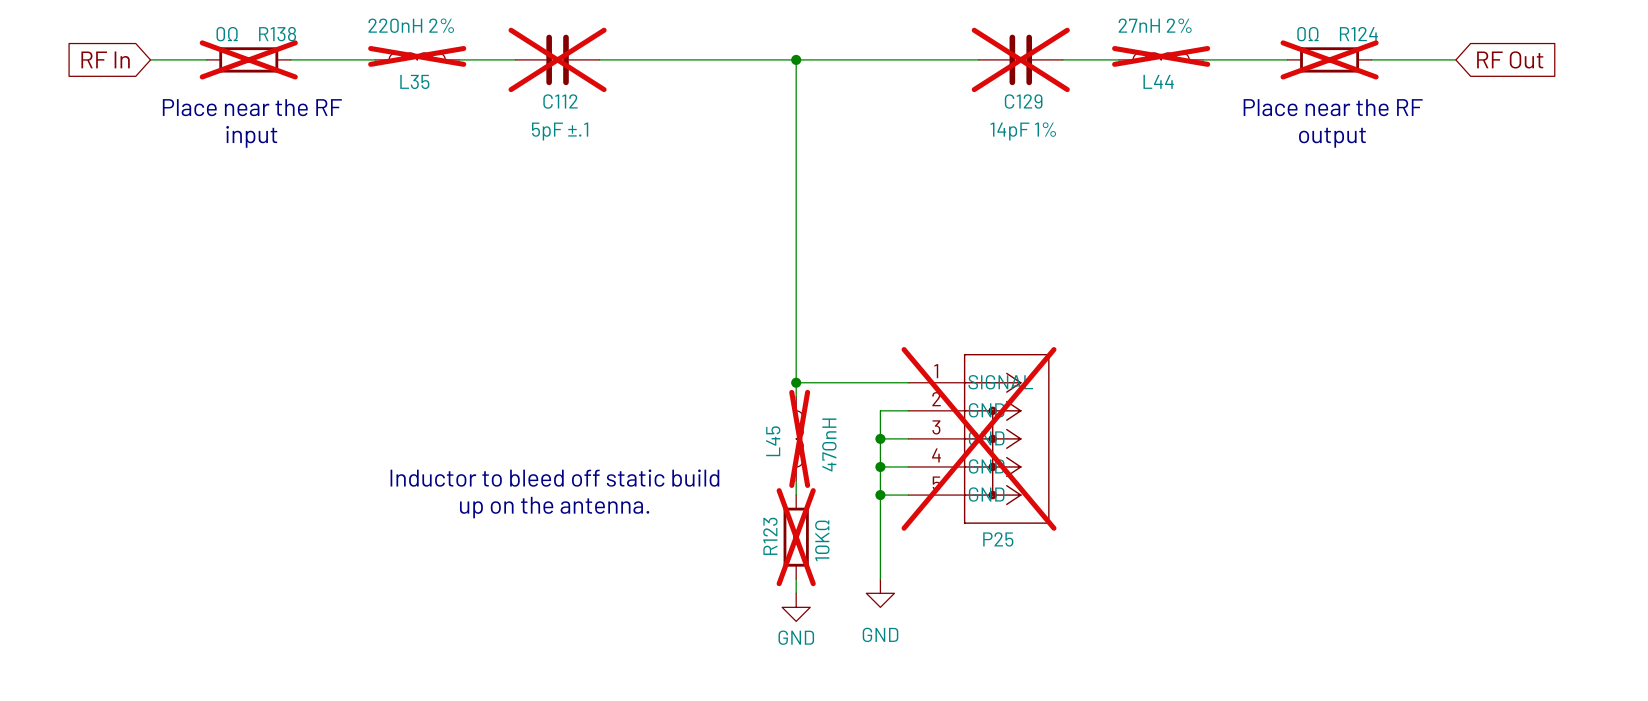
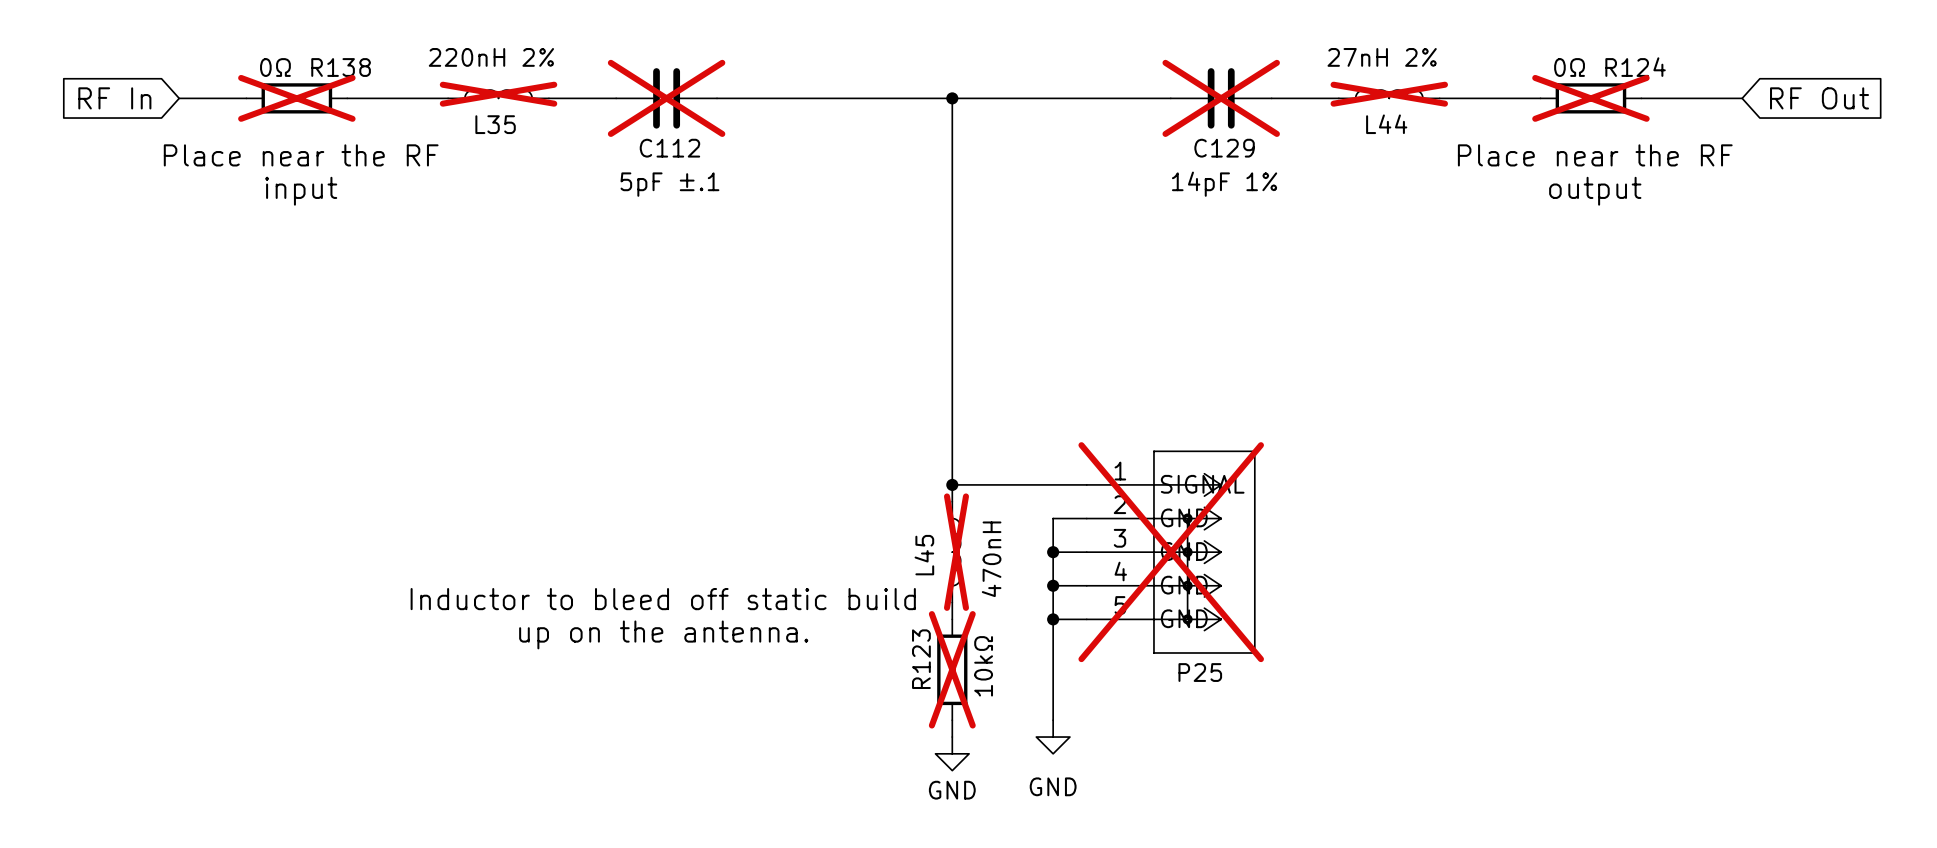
R123 value: 10KΩ (822, 540) -> 10kΩ (983, 666)

